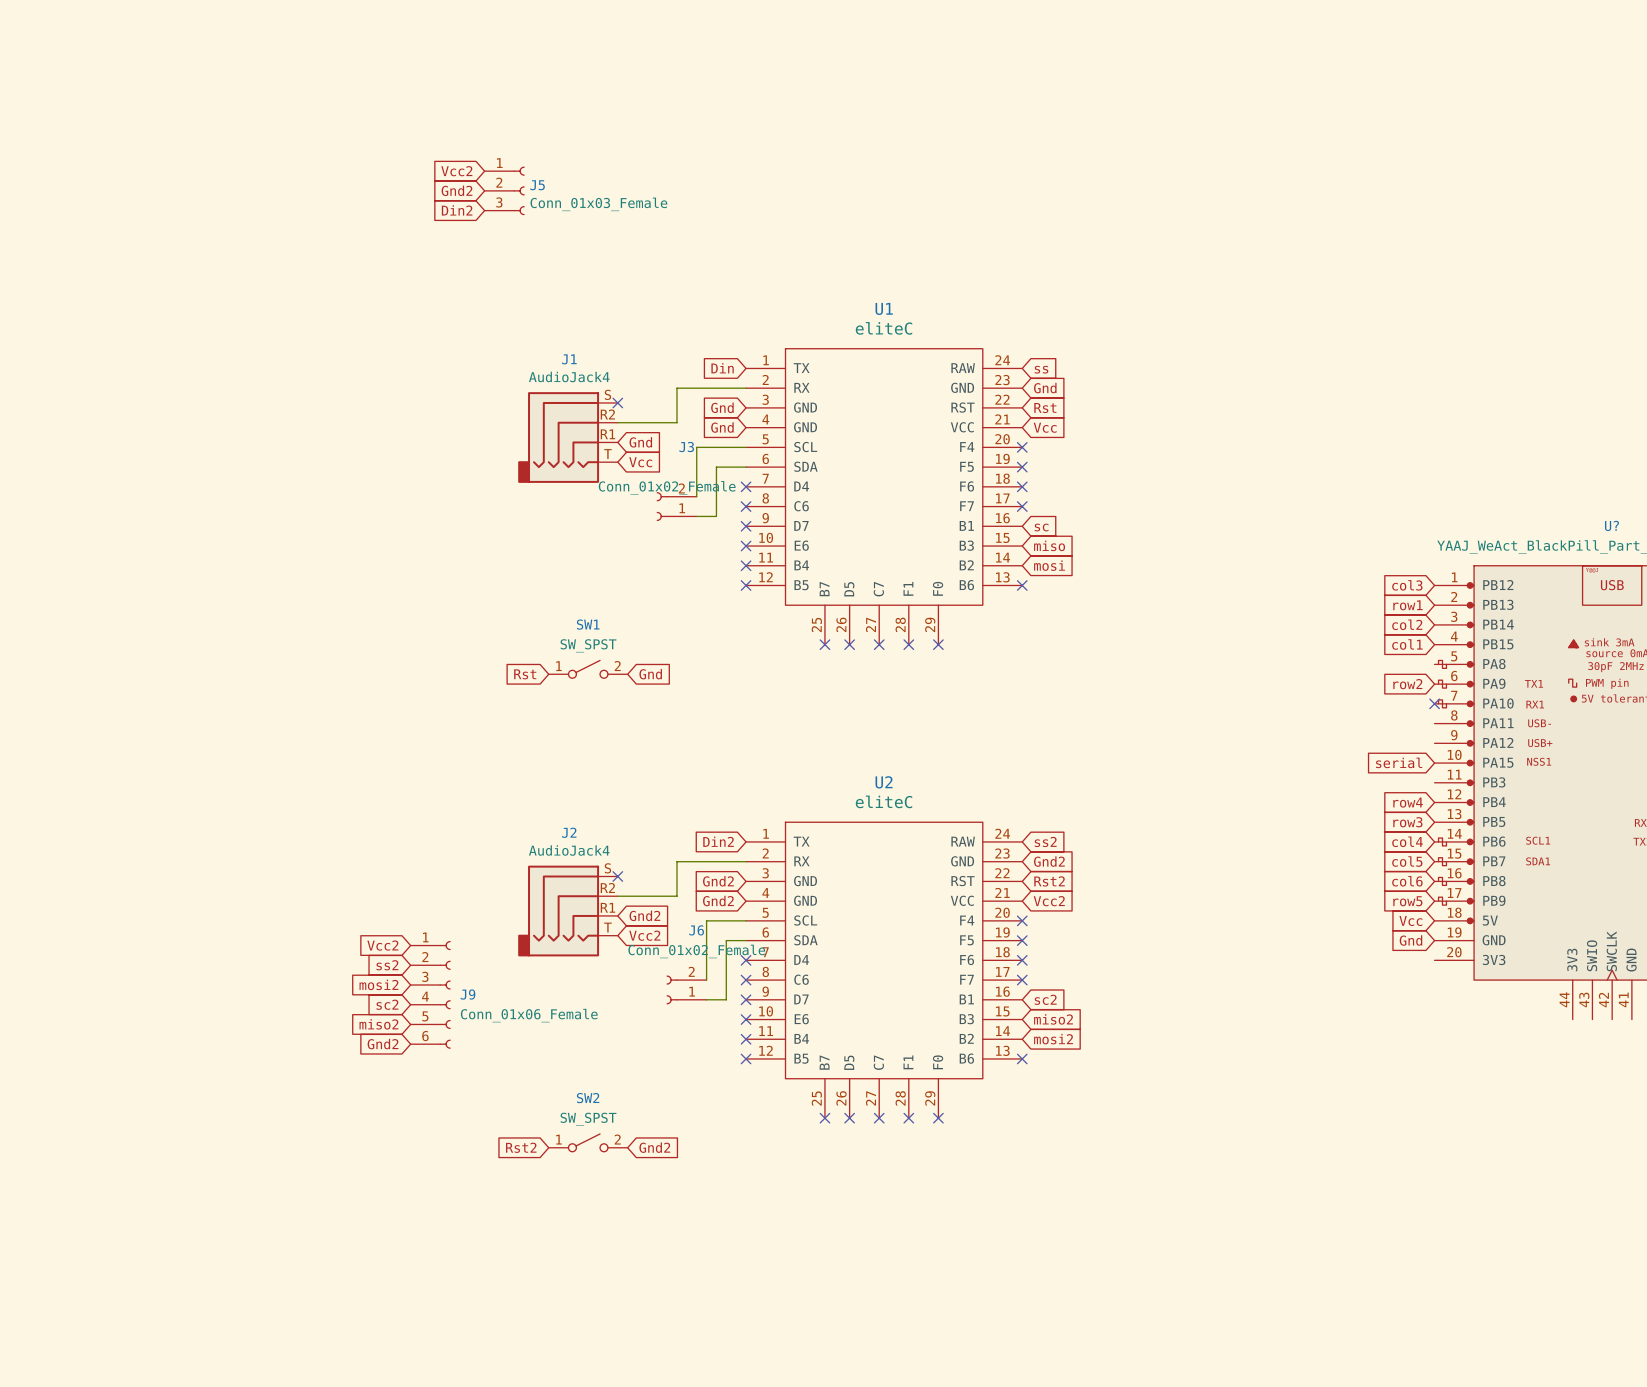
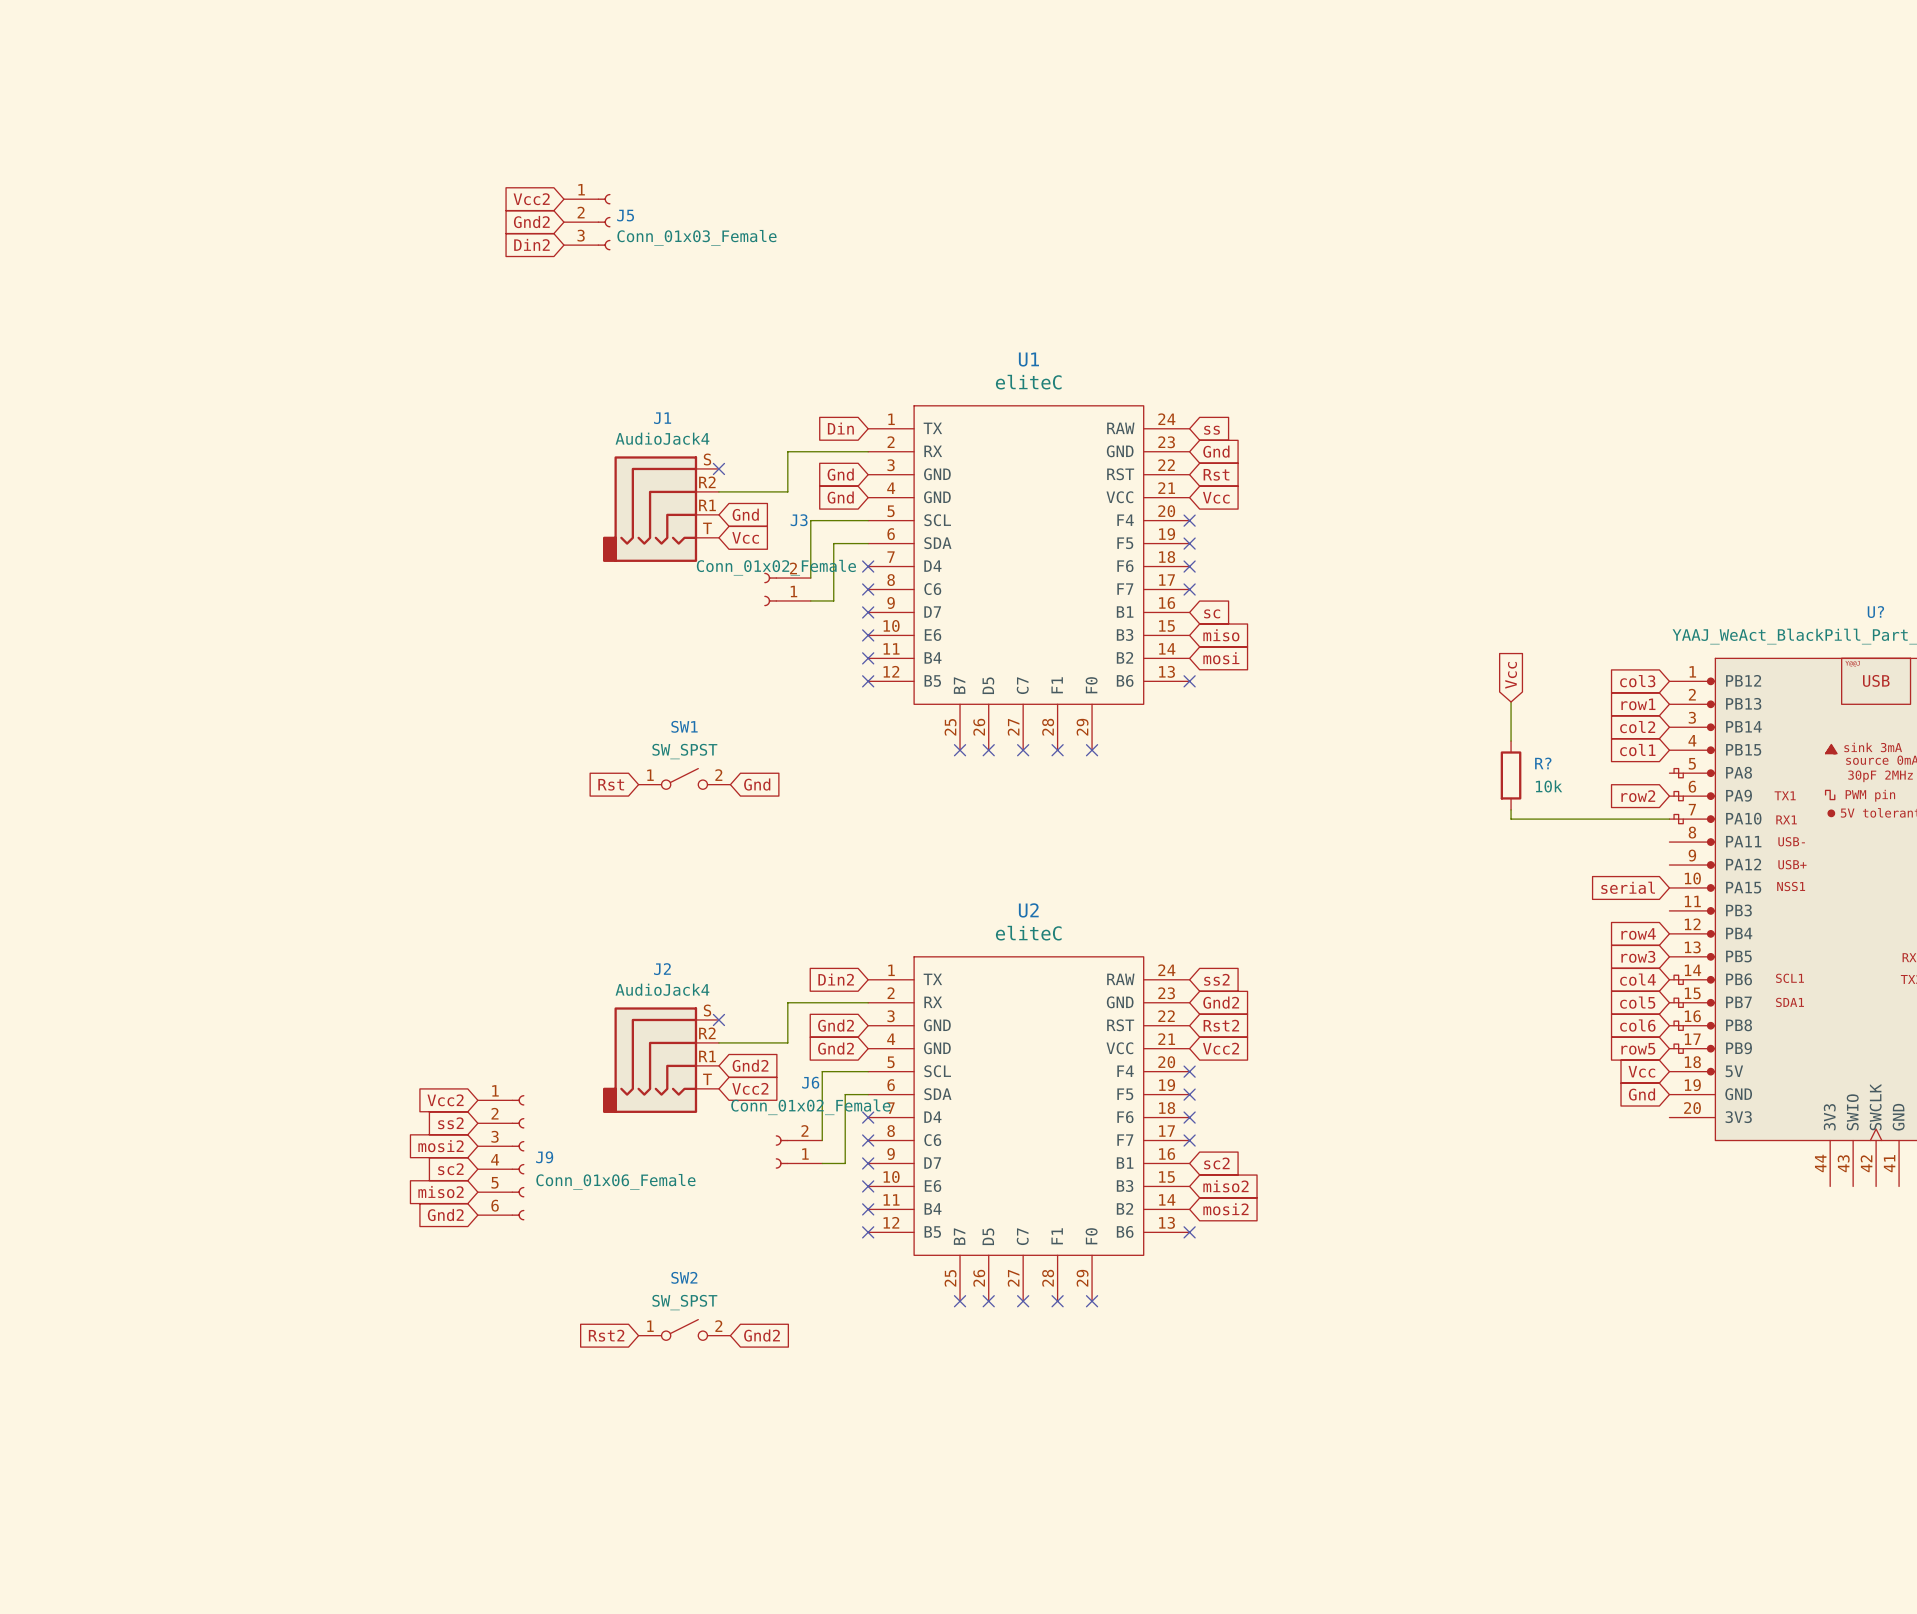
global label: none -> Vcc (1511, 675)
wire: none -> (1511, 702) (1511, 741)
R?: none -> 10k (1511, 775)
wire: none -> (1511, 809) (1511, 819) (1669, 819)
no-connect mark: (1434, 703) -> none

